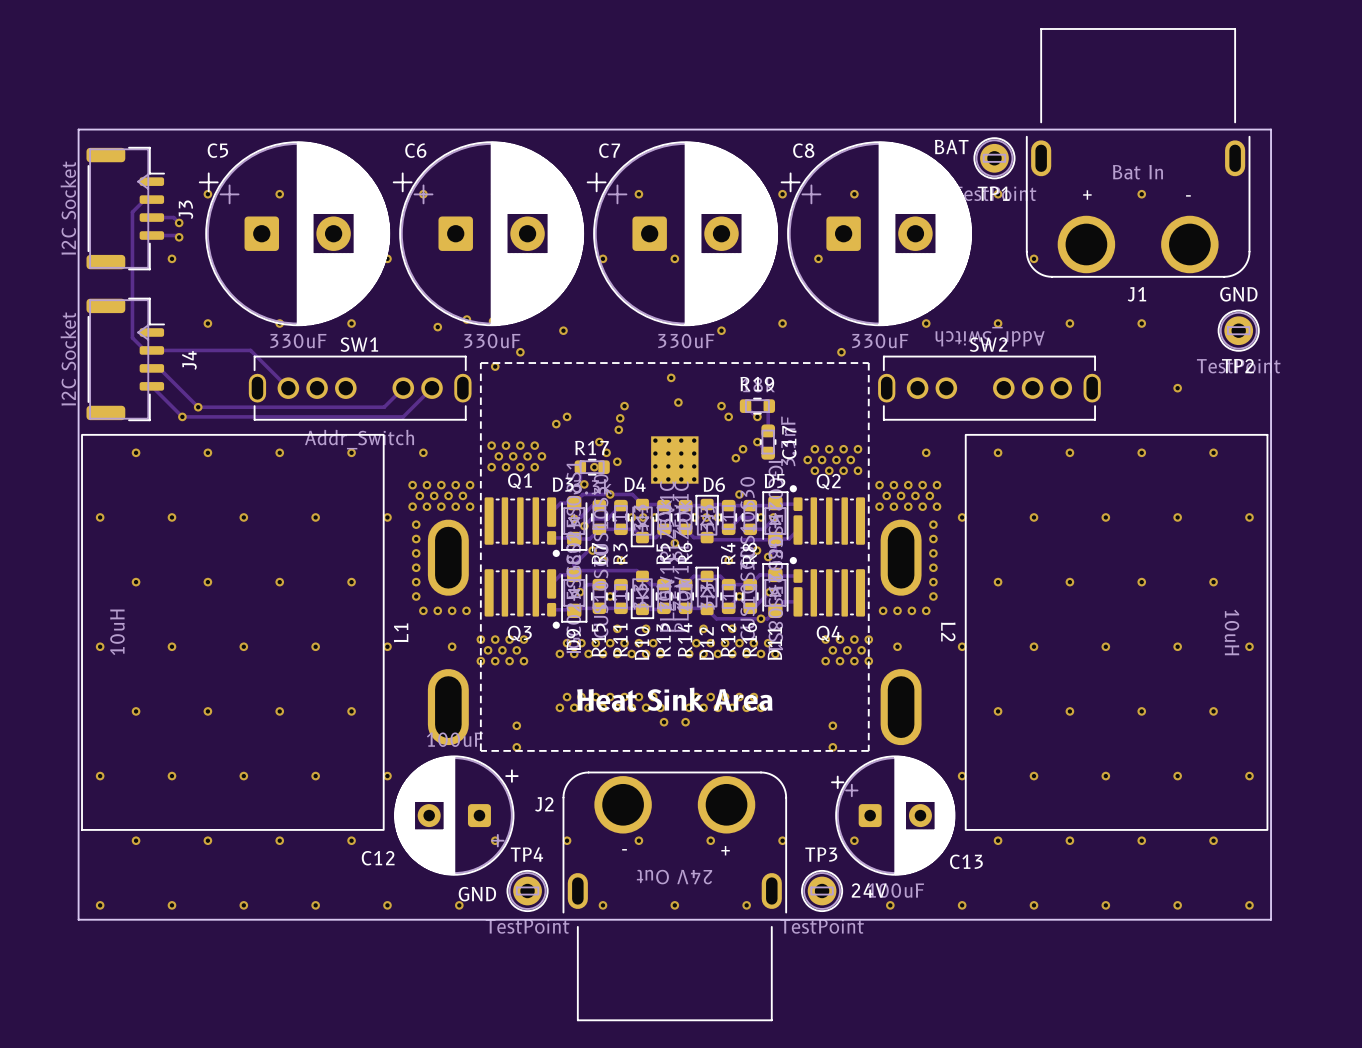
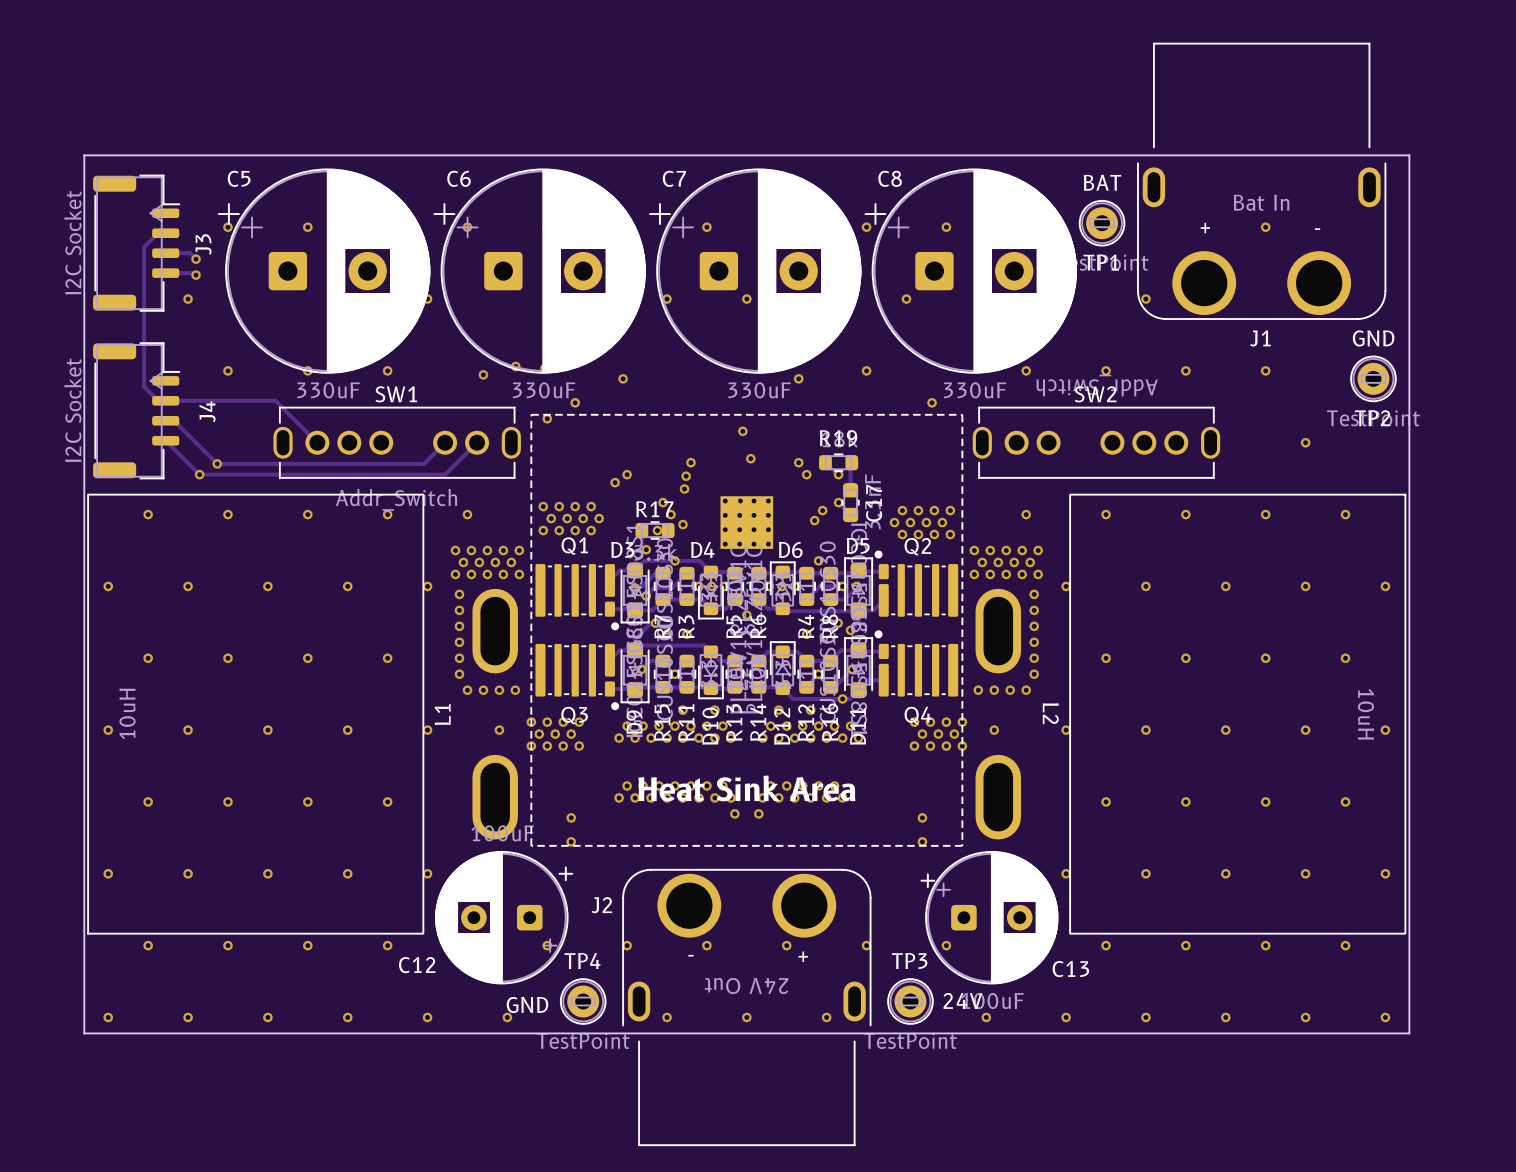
text position: BAT (951, 146) -> BAT (1102, 182)
TP1 position: (994, 158) -> (1102, 223)
via: (998, 194) -> none

